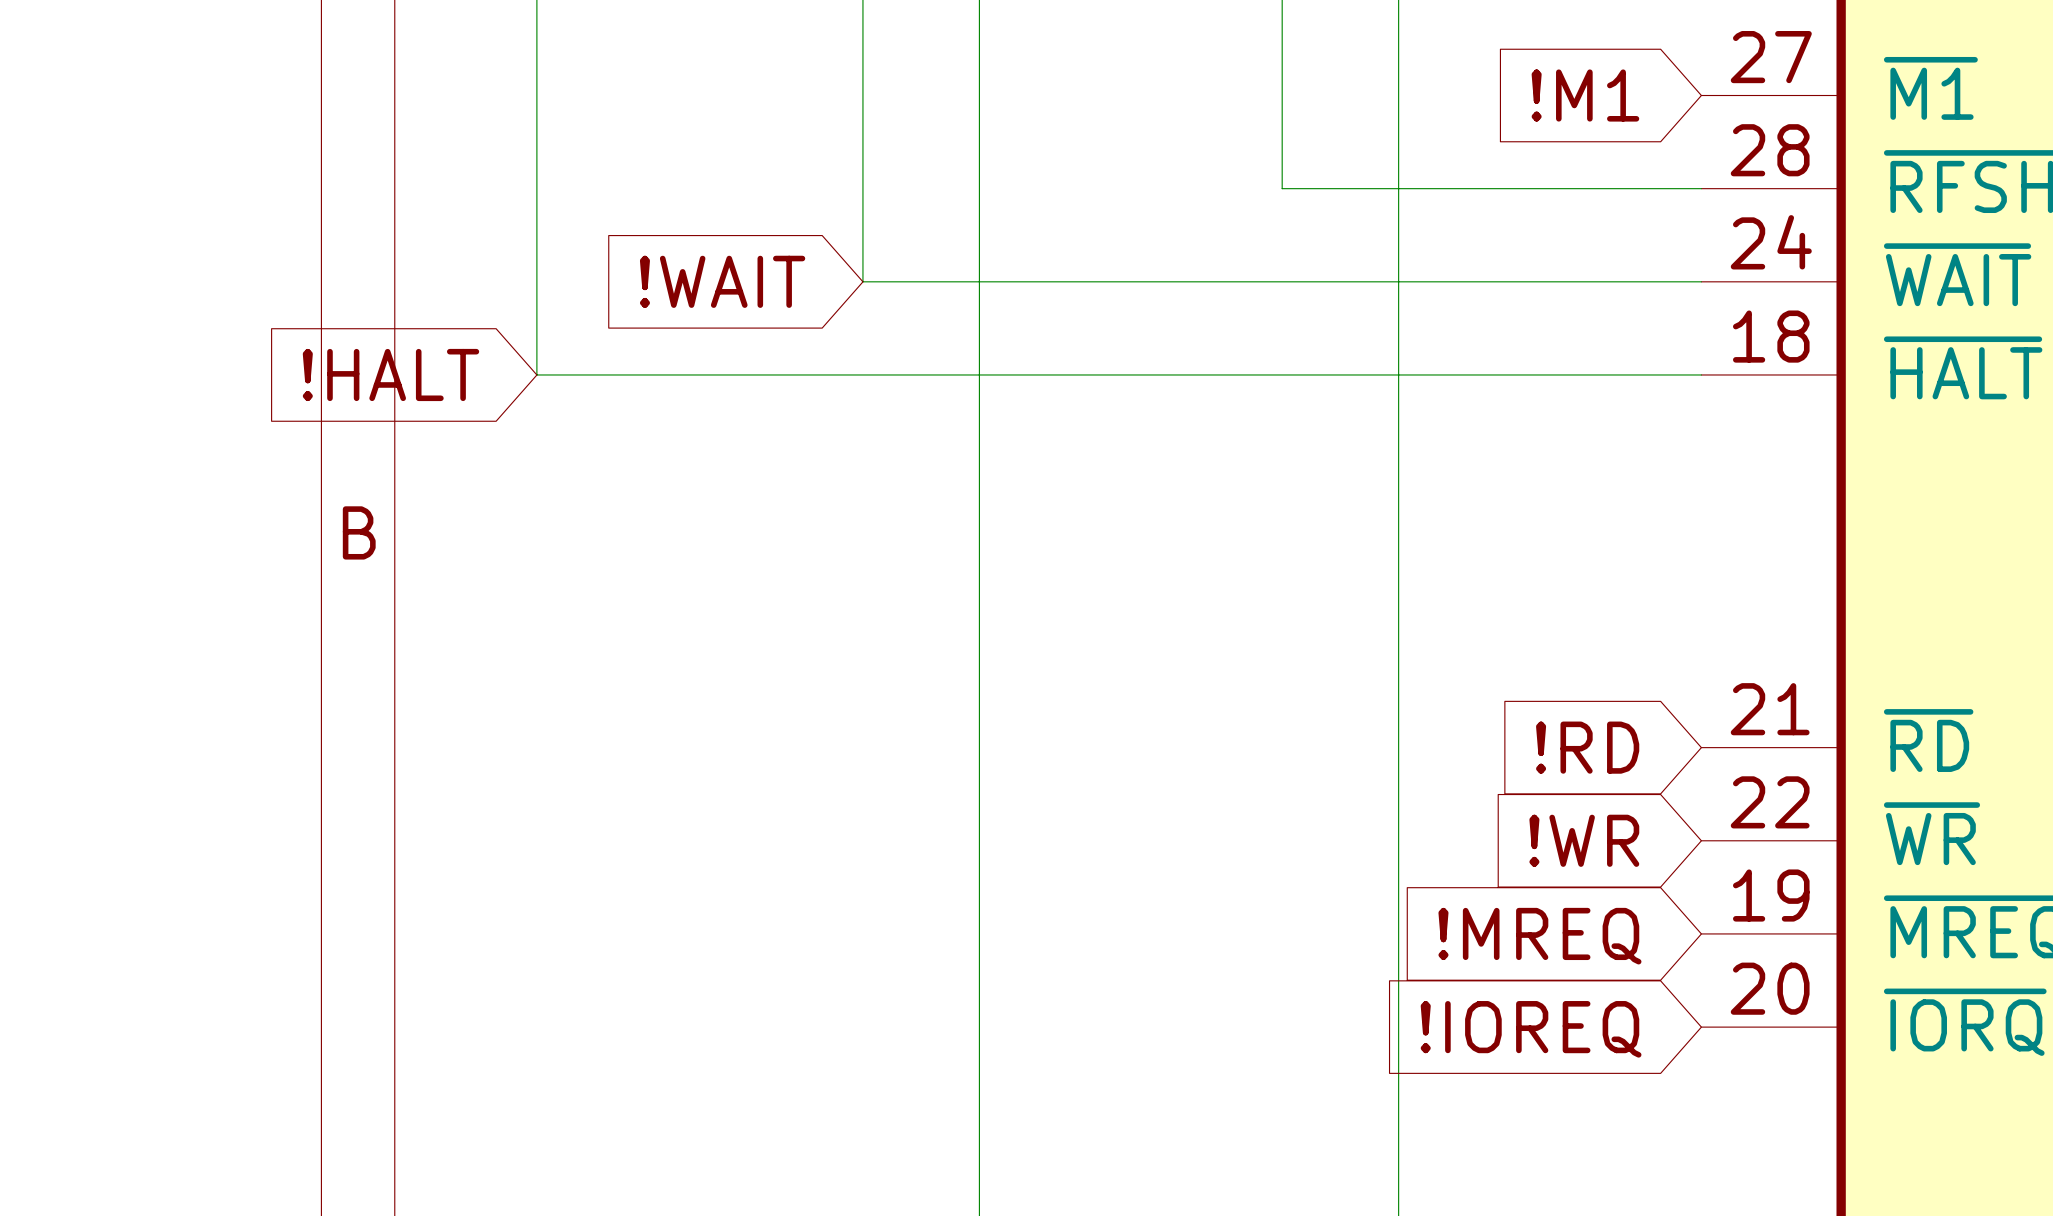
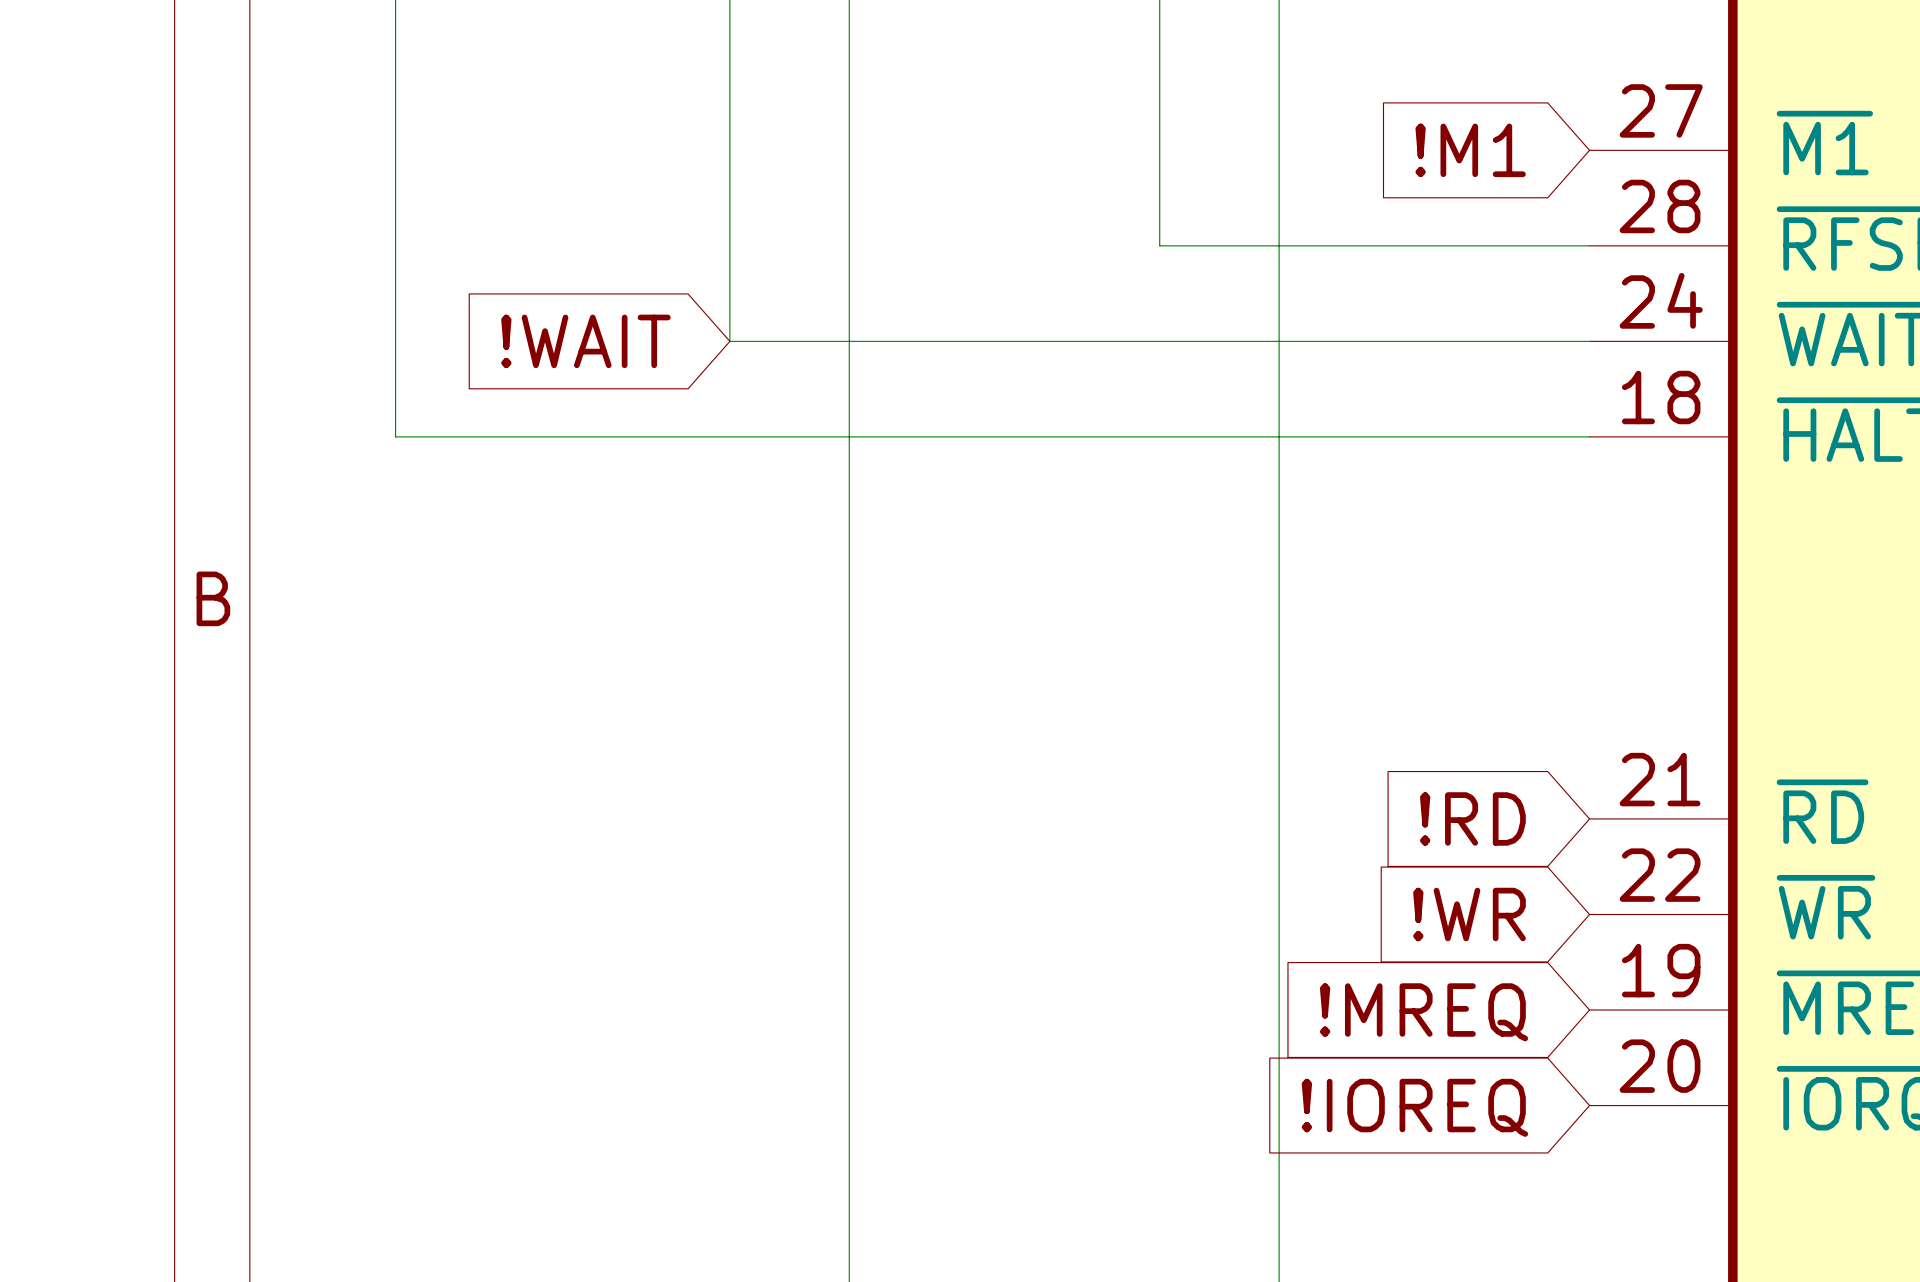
global label: !HALT (390, 374) -> none

